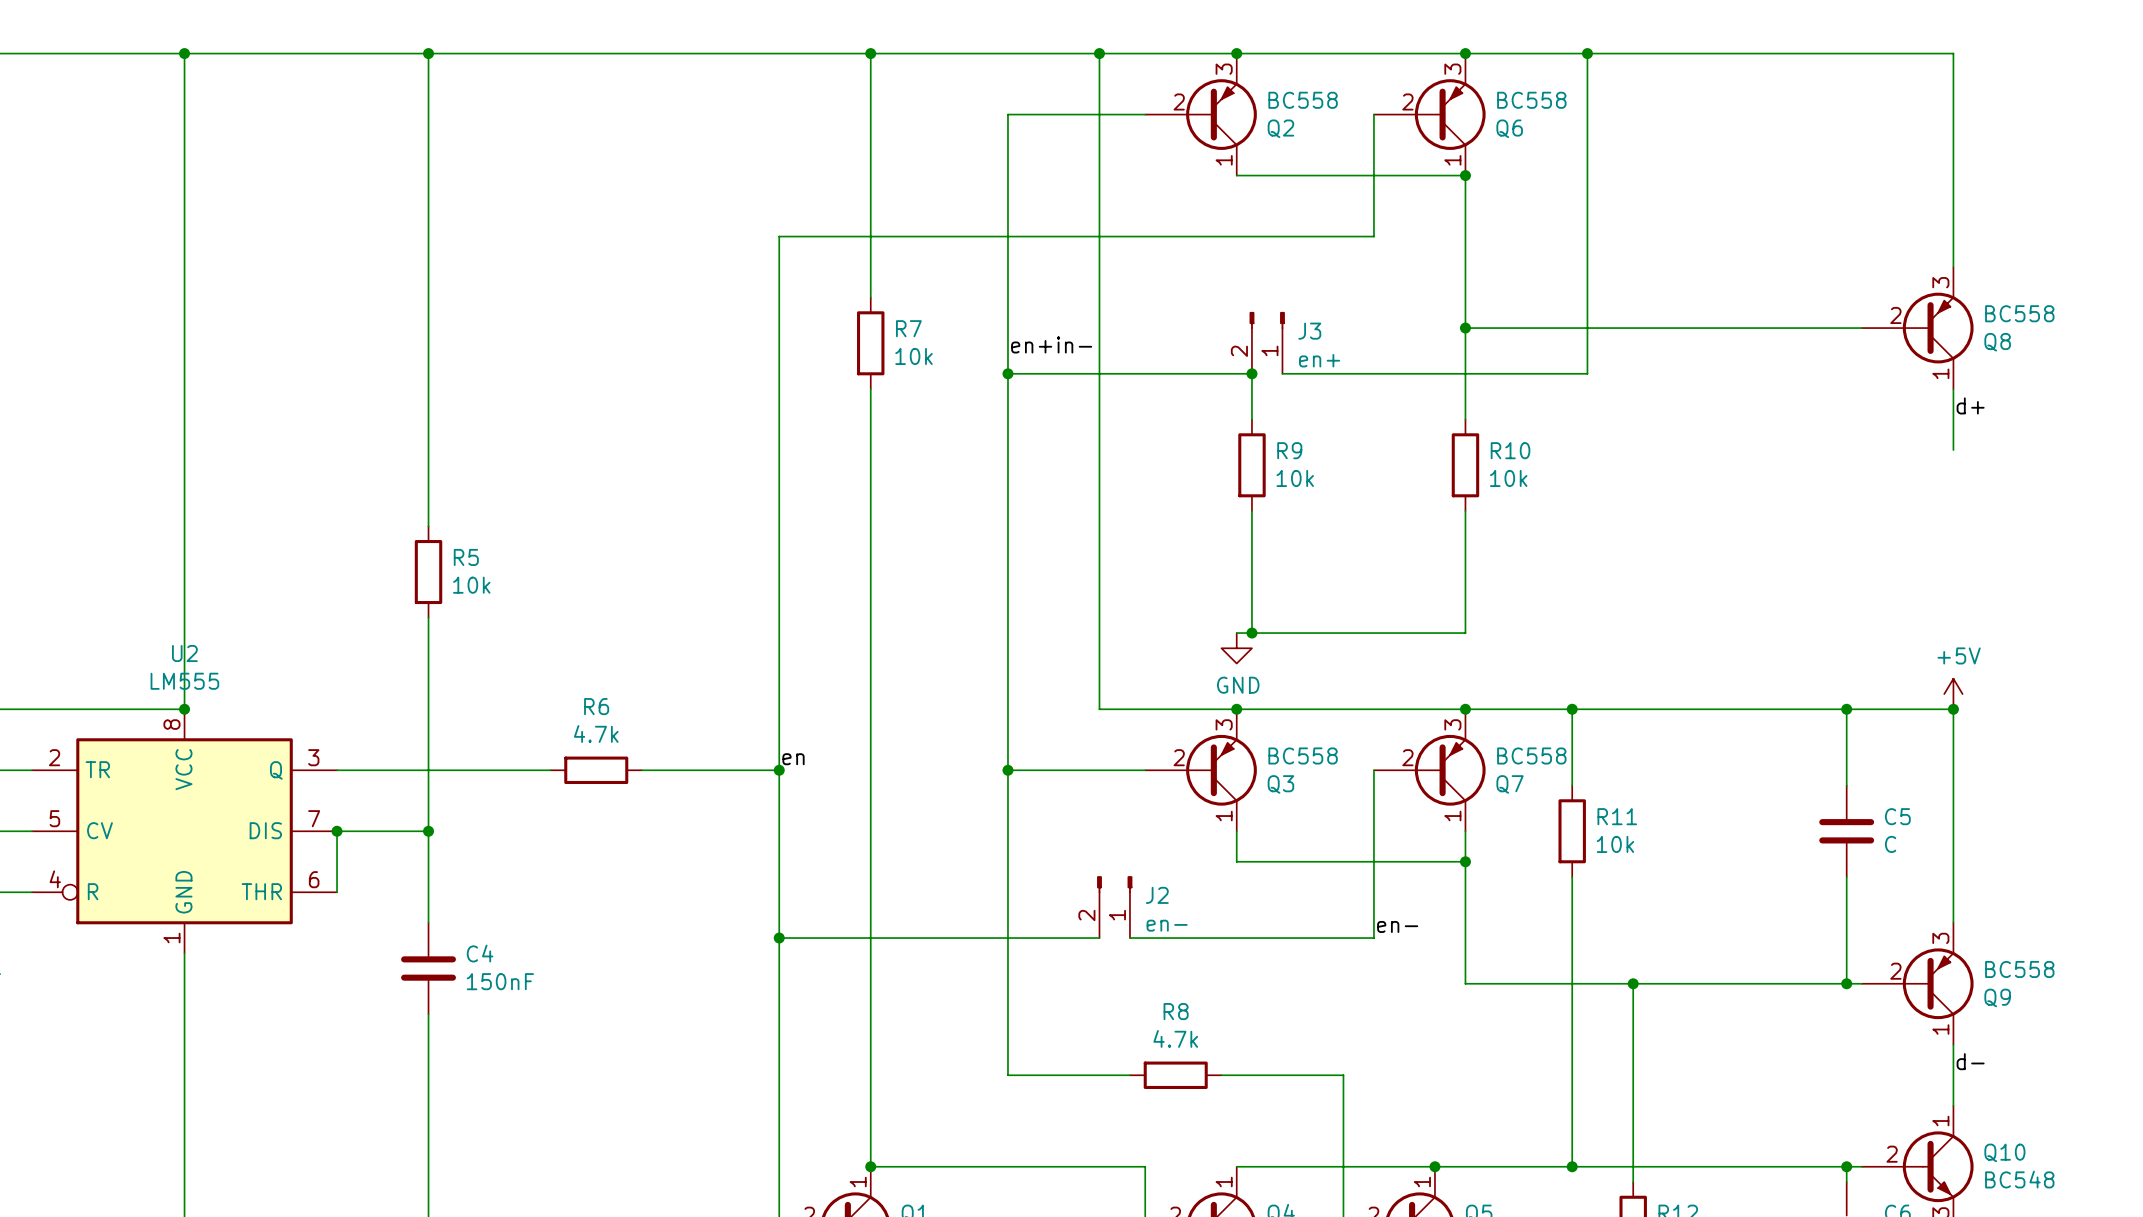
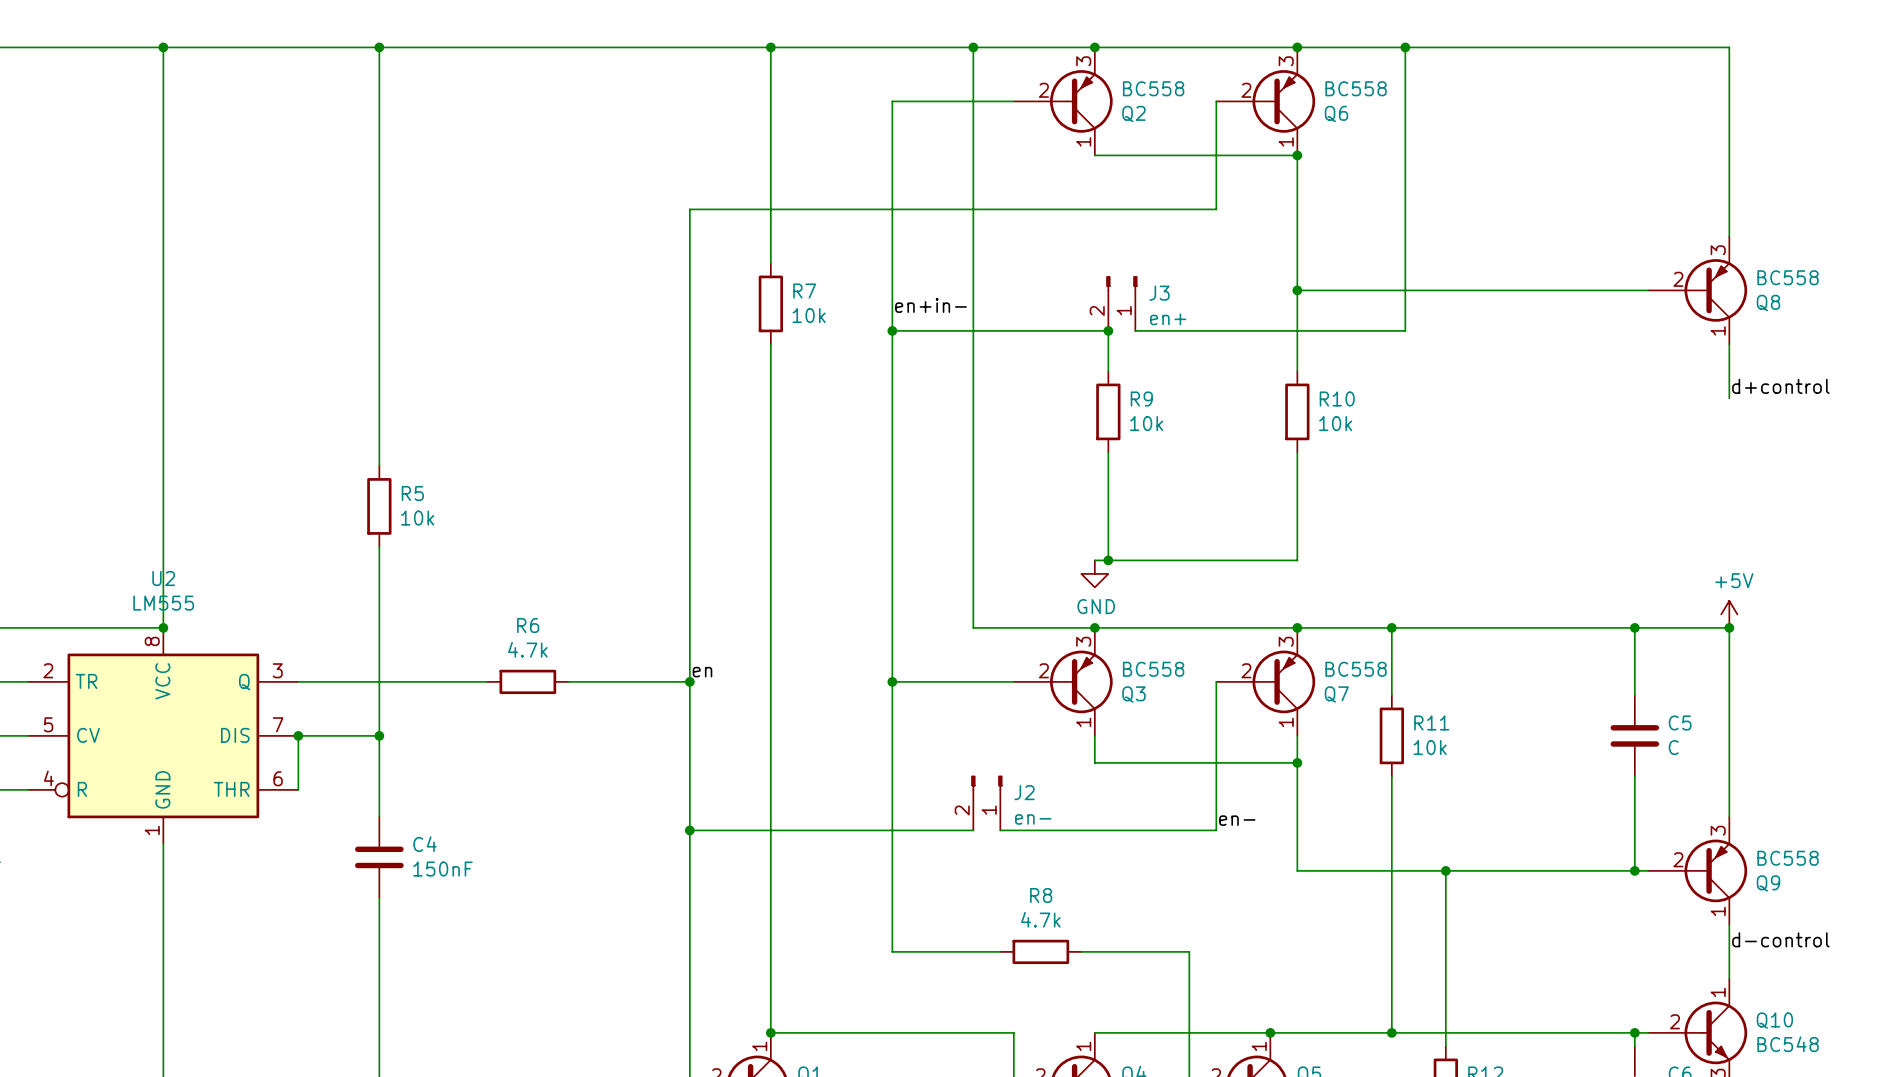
label: d+ (1970, 405) -> none
label: none -> d+control (1780, 386)
label: d- (1970, 1061) -> d-control (1780, 939)

